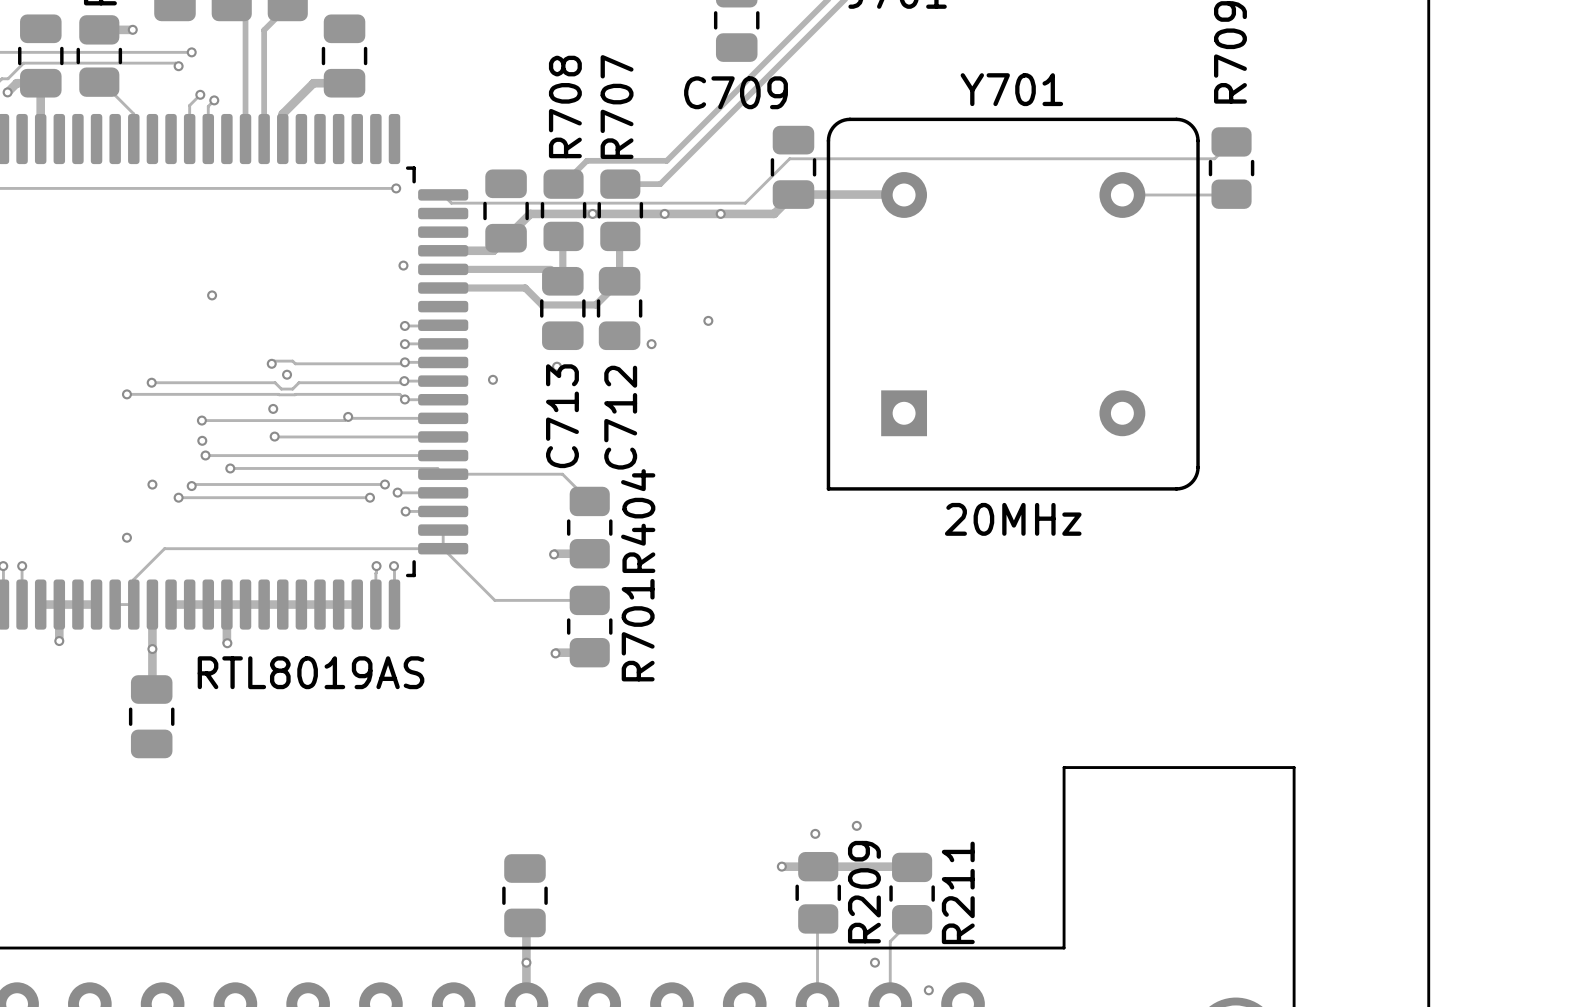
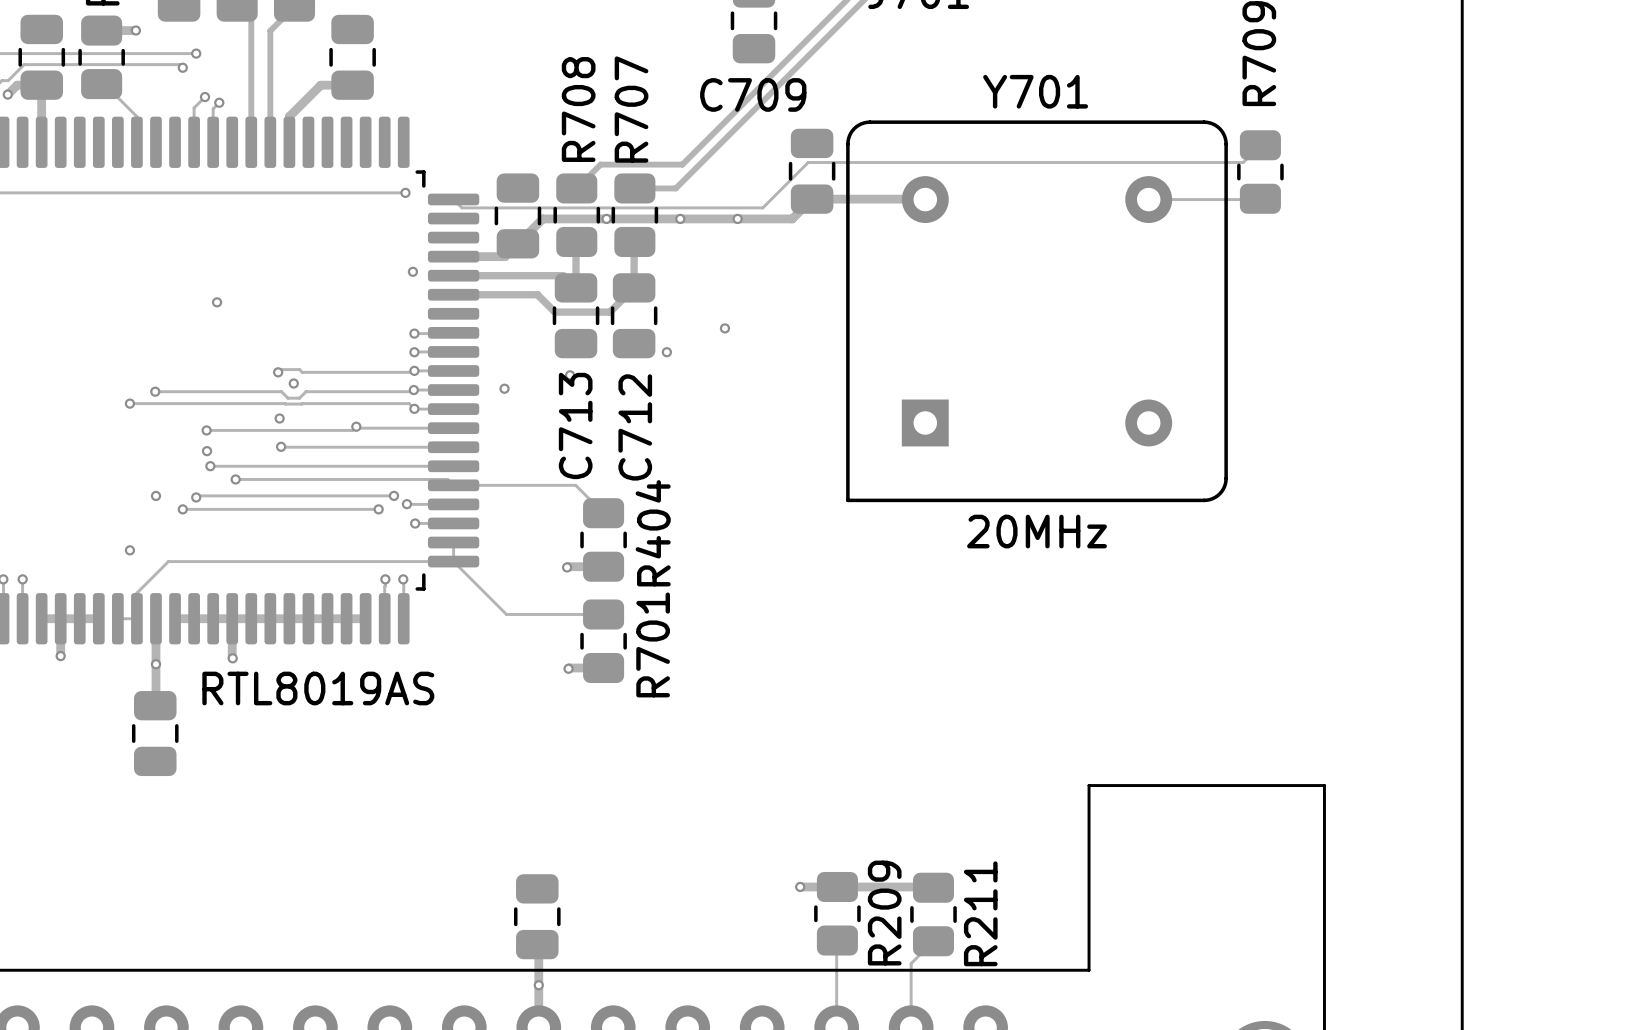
via: (856, 825) -> none
via: (815, 833) -> none
via: (874, 962) -> none
via: (928, 990) -> none

